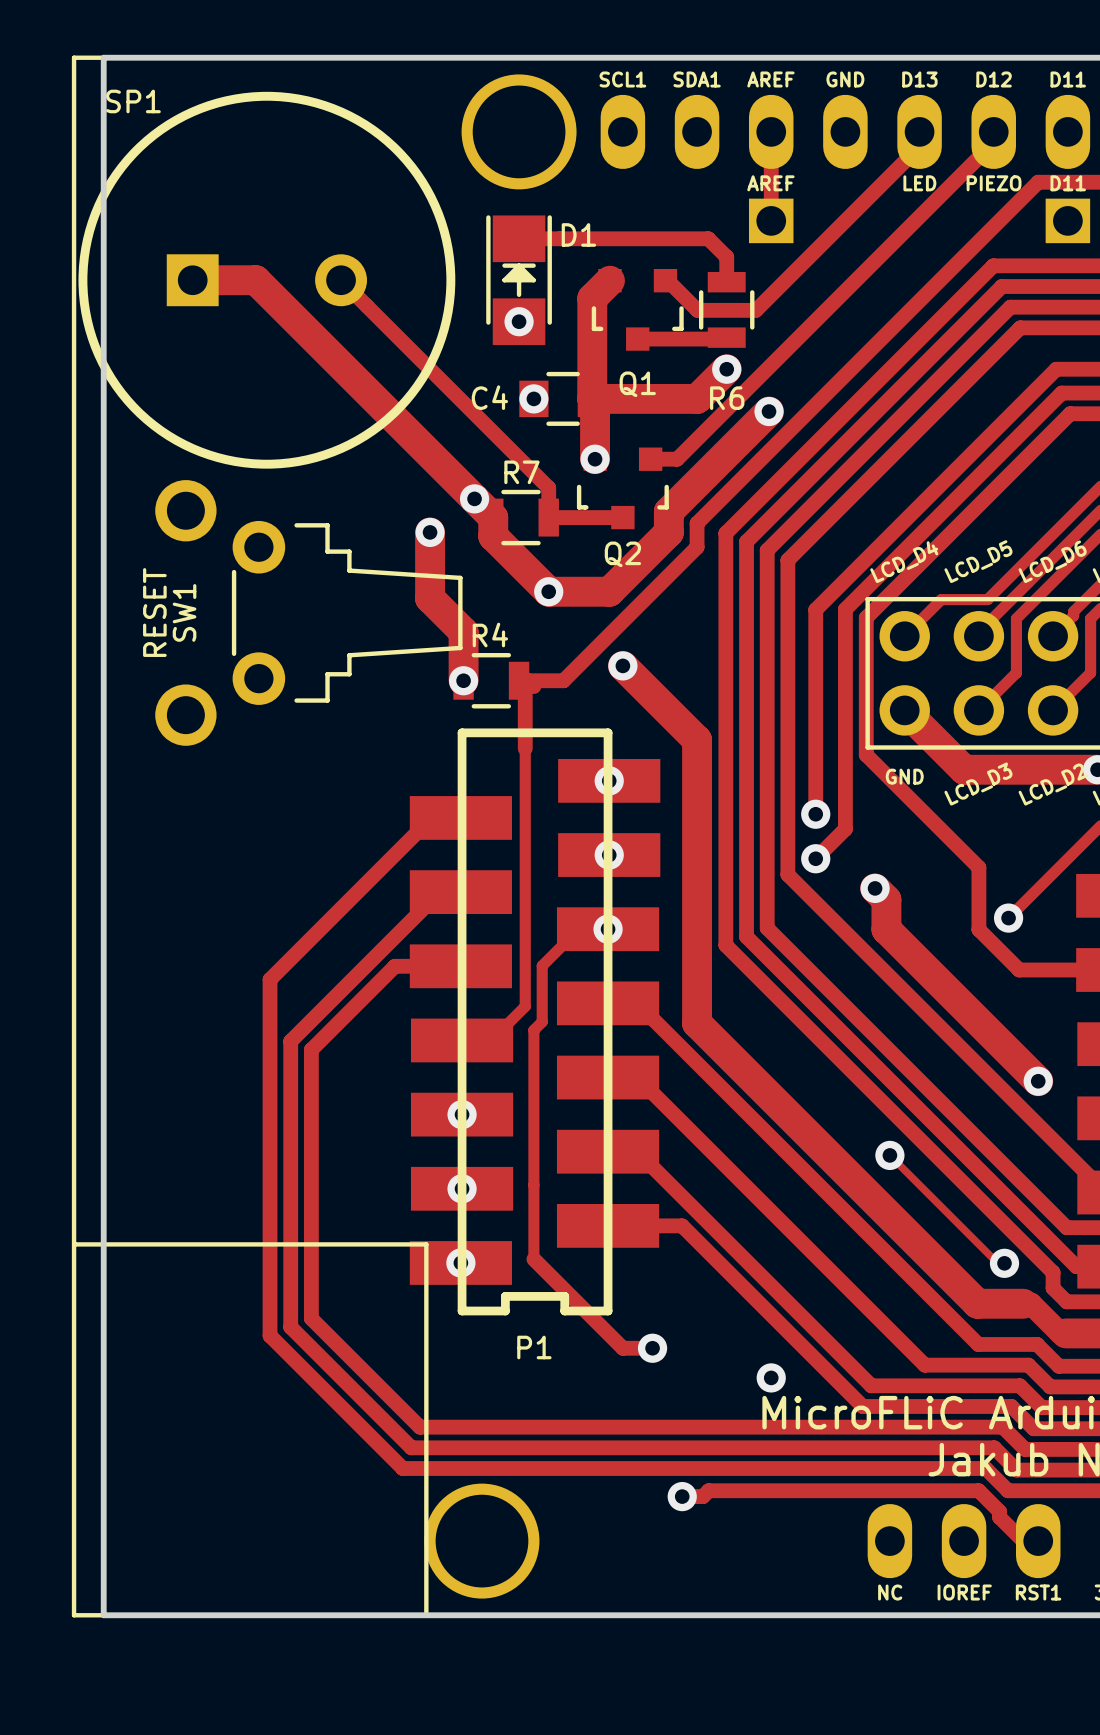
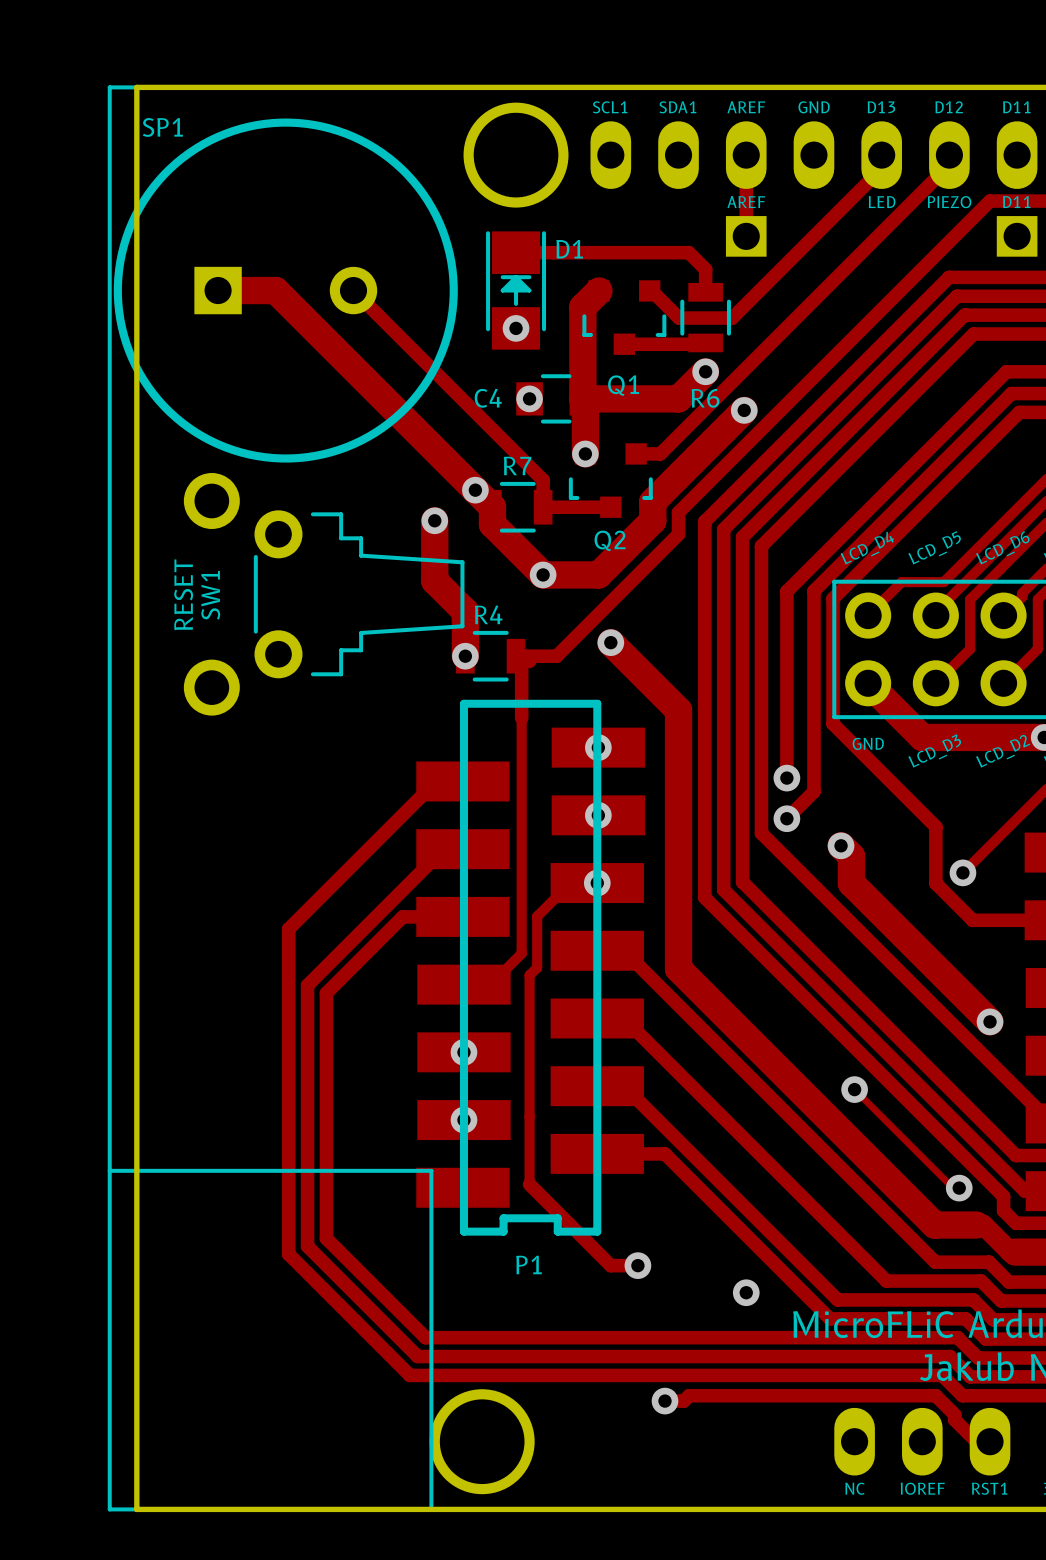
via: (460, 1262) -> none

